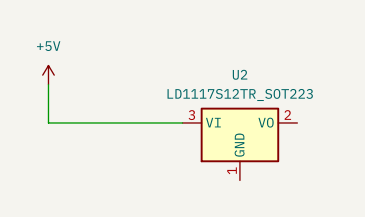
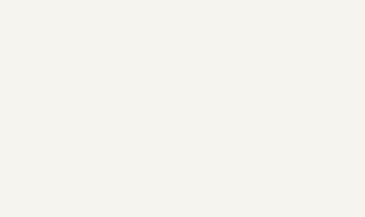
power symbol: +5V (48, 75) -> none
wire: (48, 84) (48, 122) (182, 122) -> none
U2: LD1117S12TR_SOT223 (239, 144) -> none

